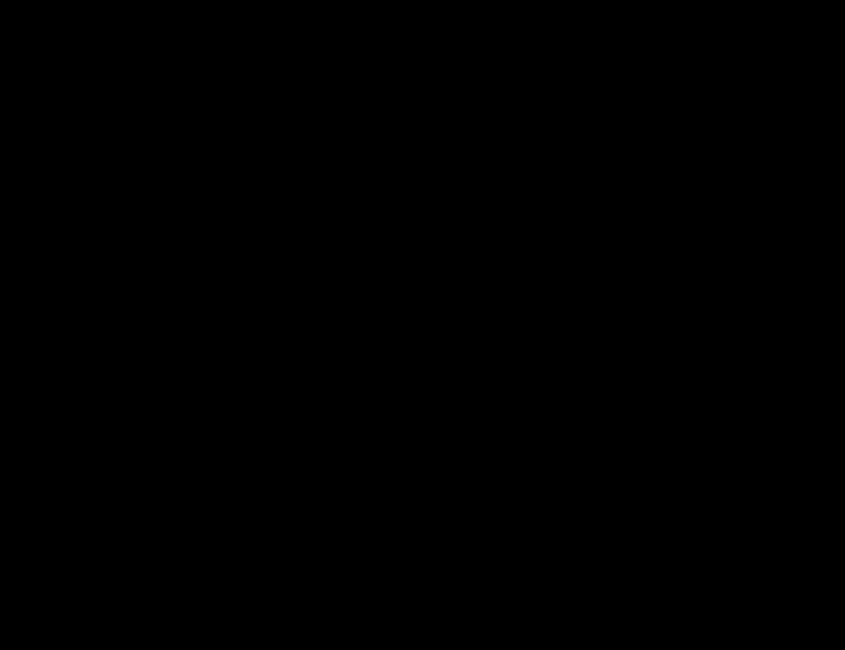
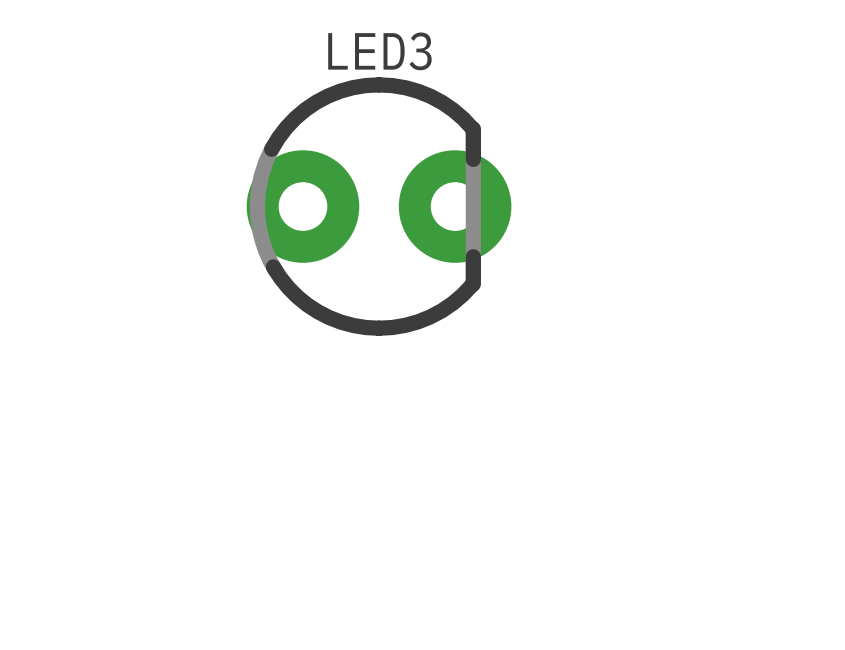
LED3: none -> (379, 206)

